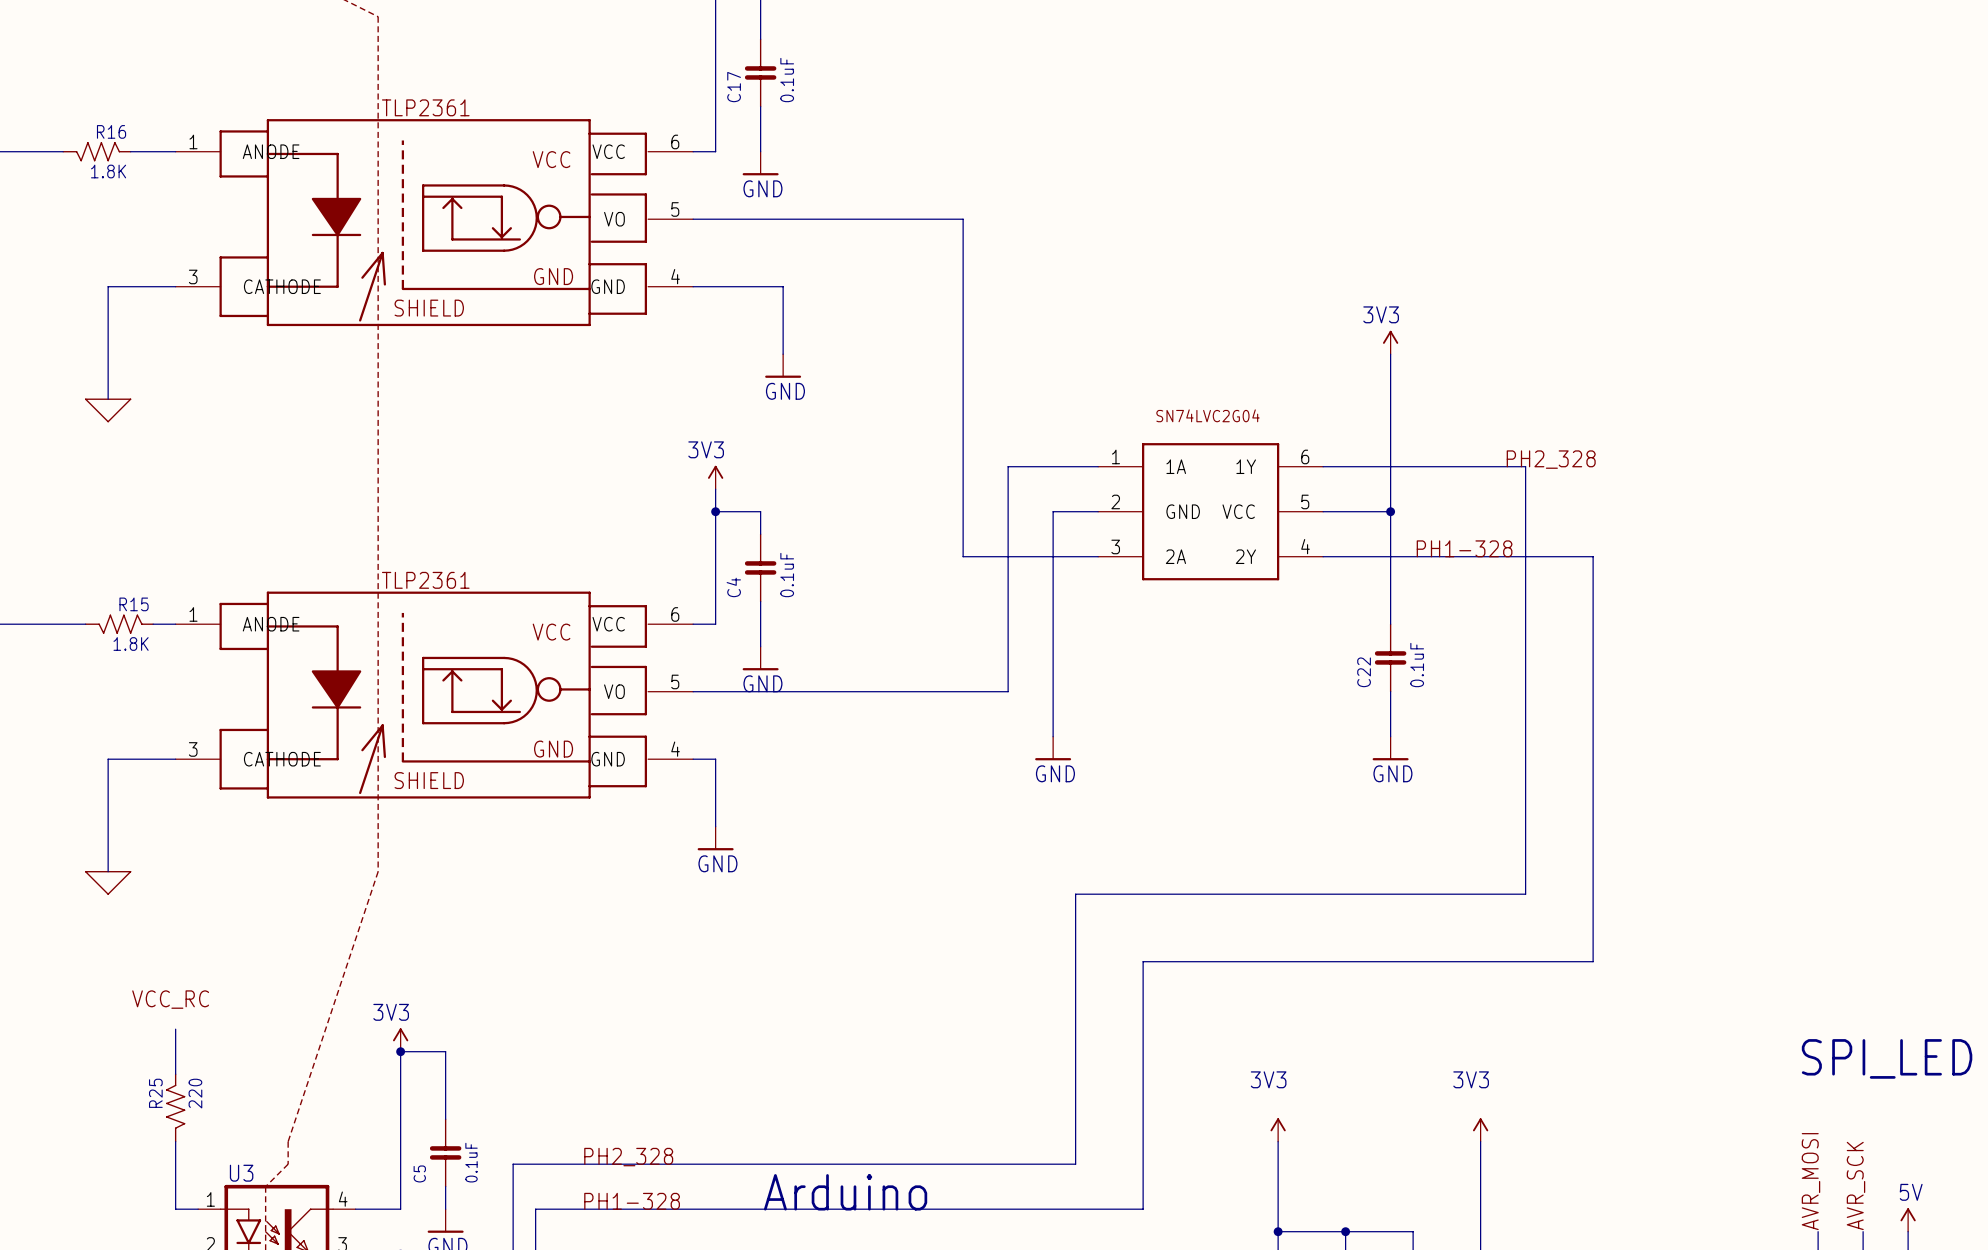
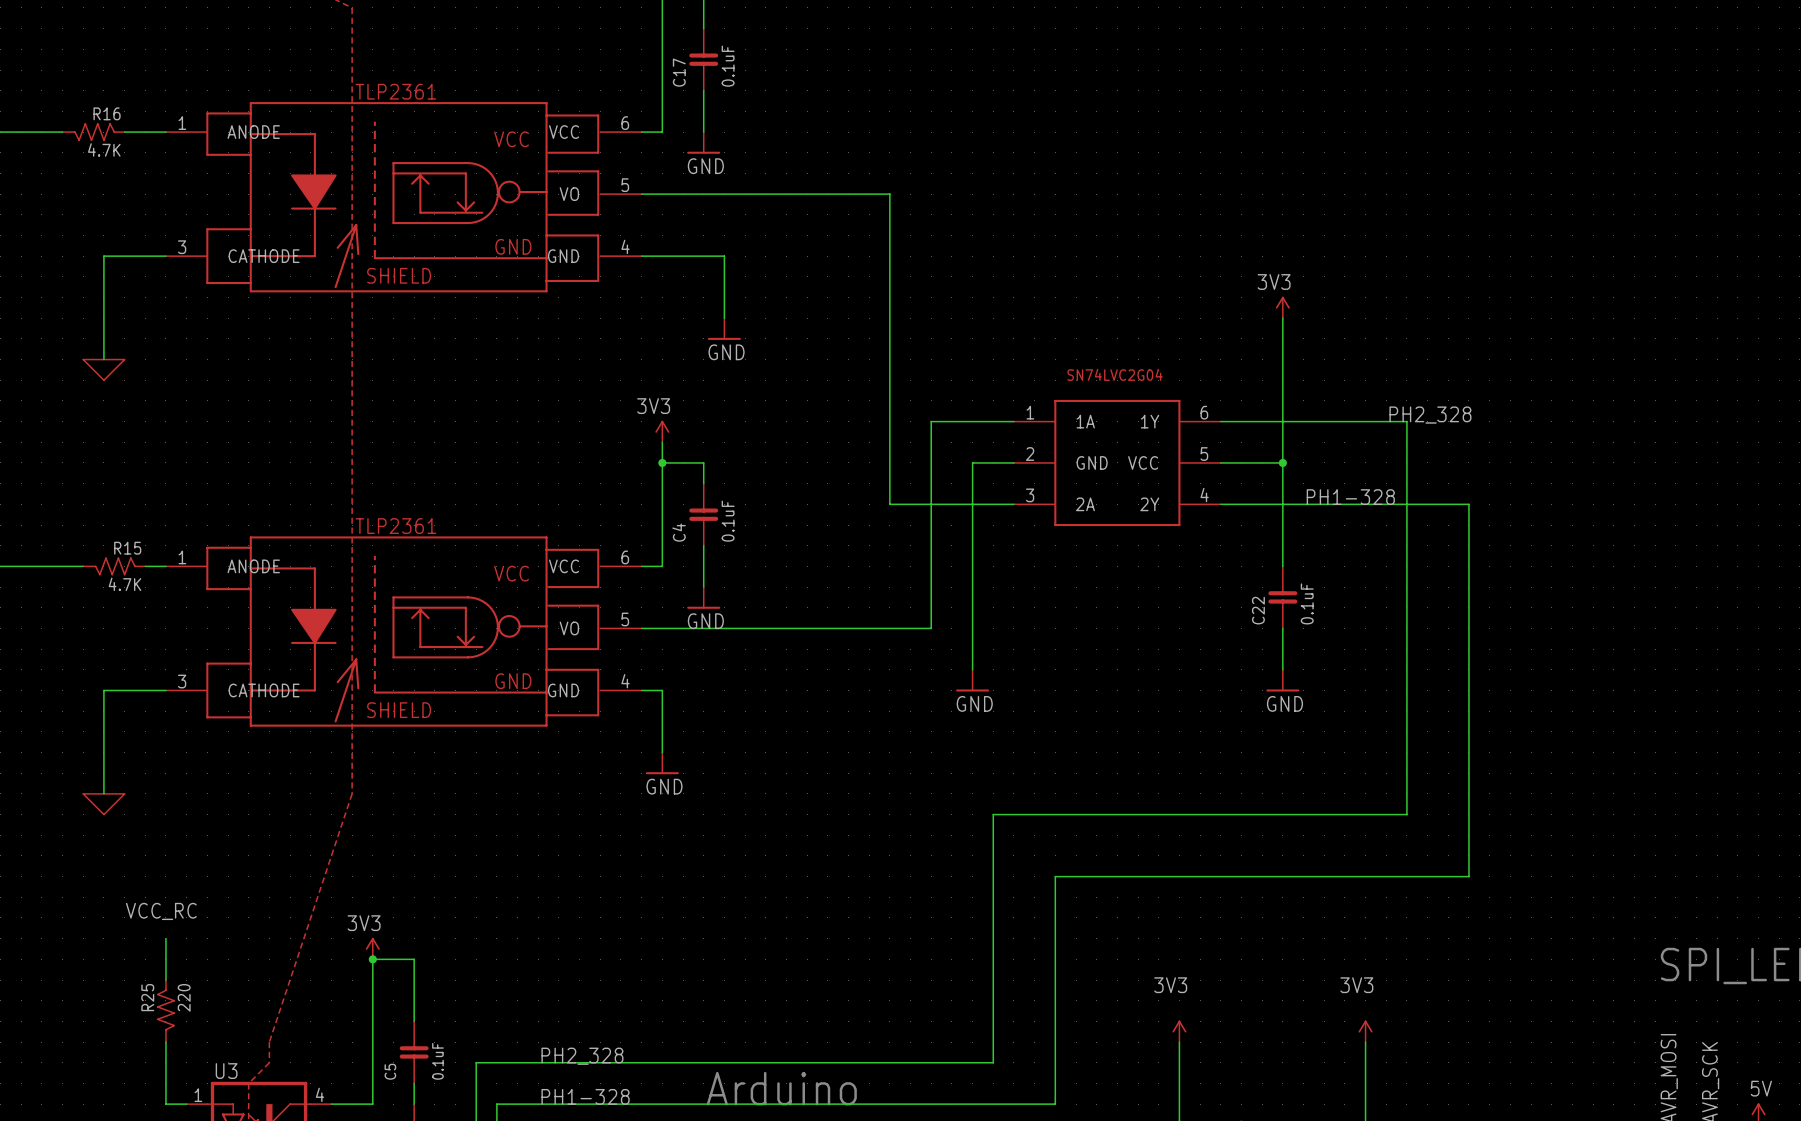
R16 value: 1.8K (108, 171) -> 4.7K (104, 149)
R15 value: 1.8K (131, 644) -> 4.7K (124, 584)

